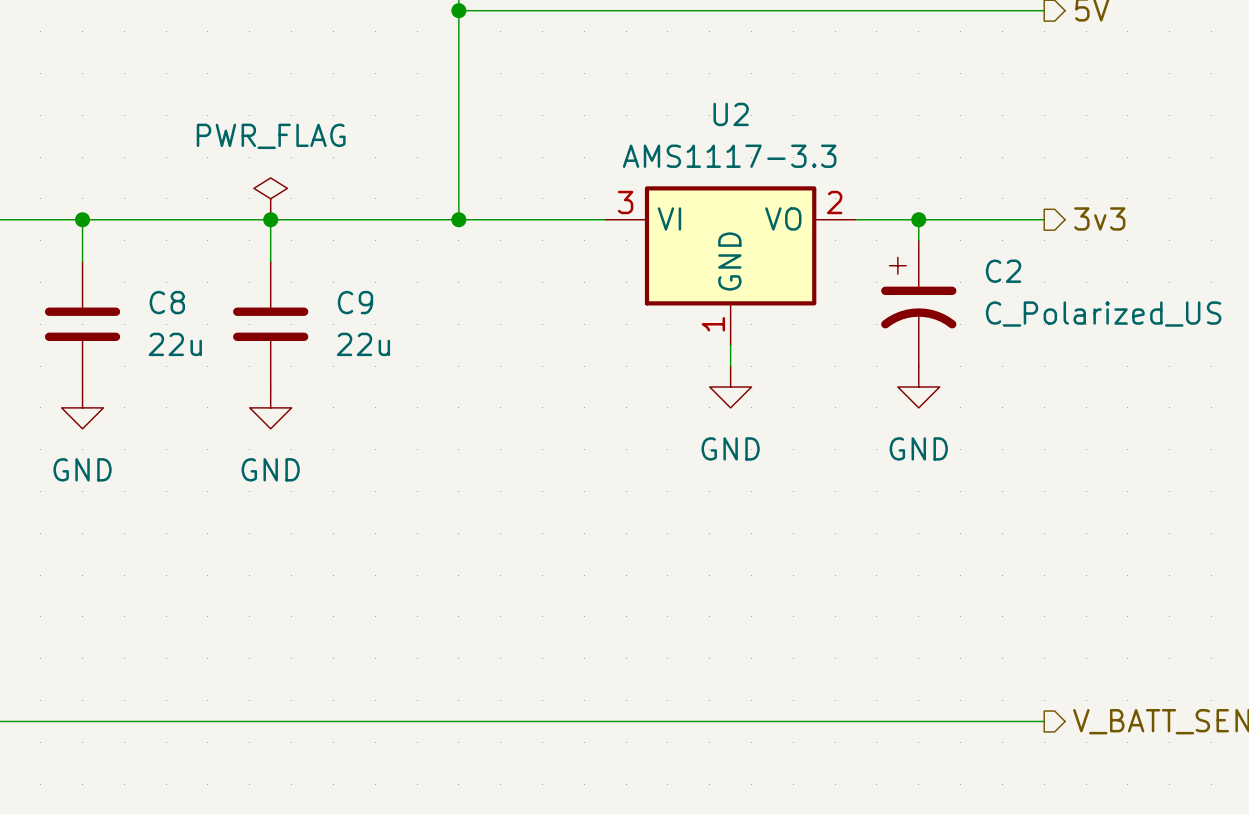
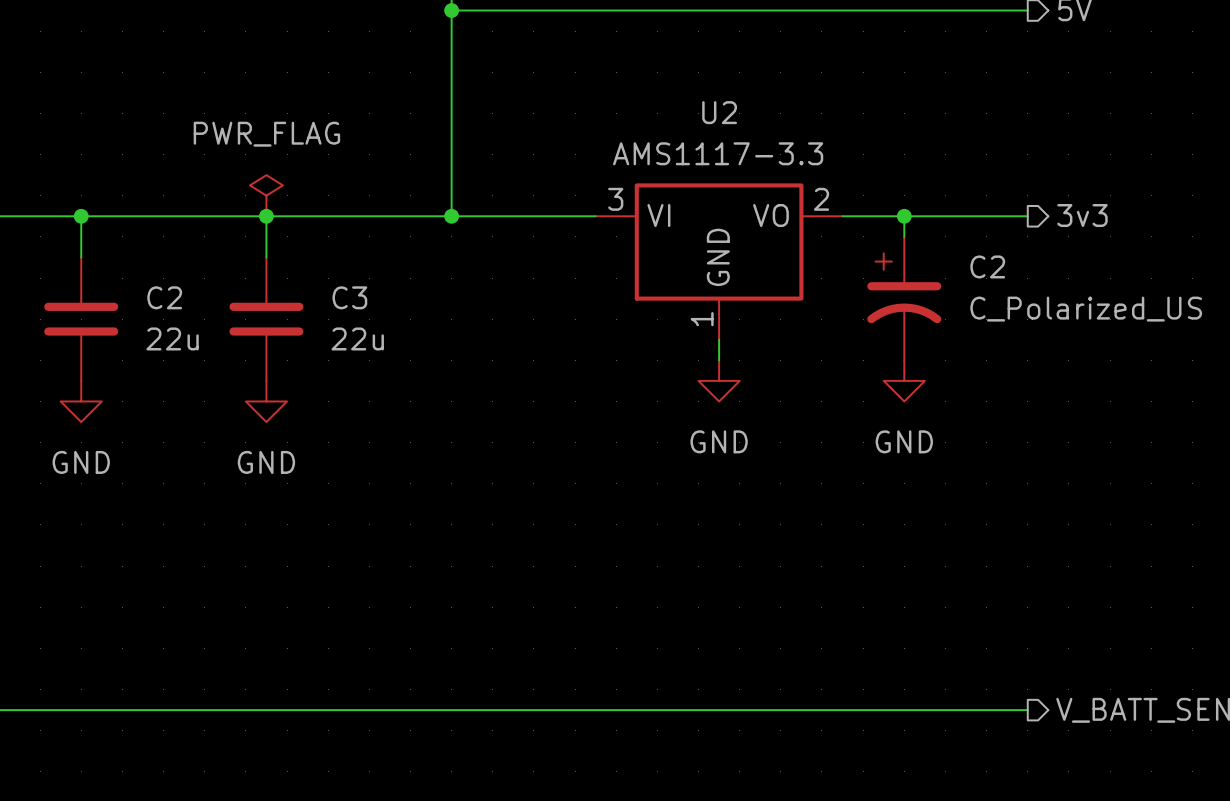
C8 name: C8 (167, 302) -> C2 (164, 297)
C9 name: C9 (355, 302) -> C3 (349, 297)

